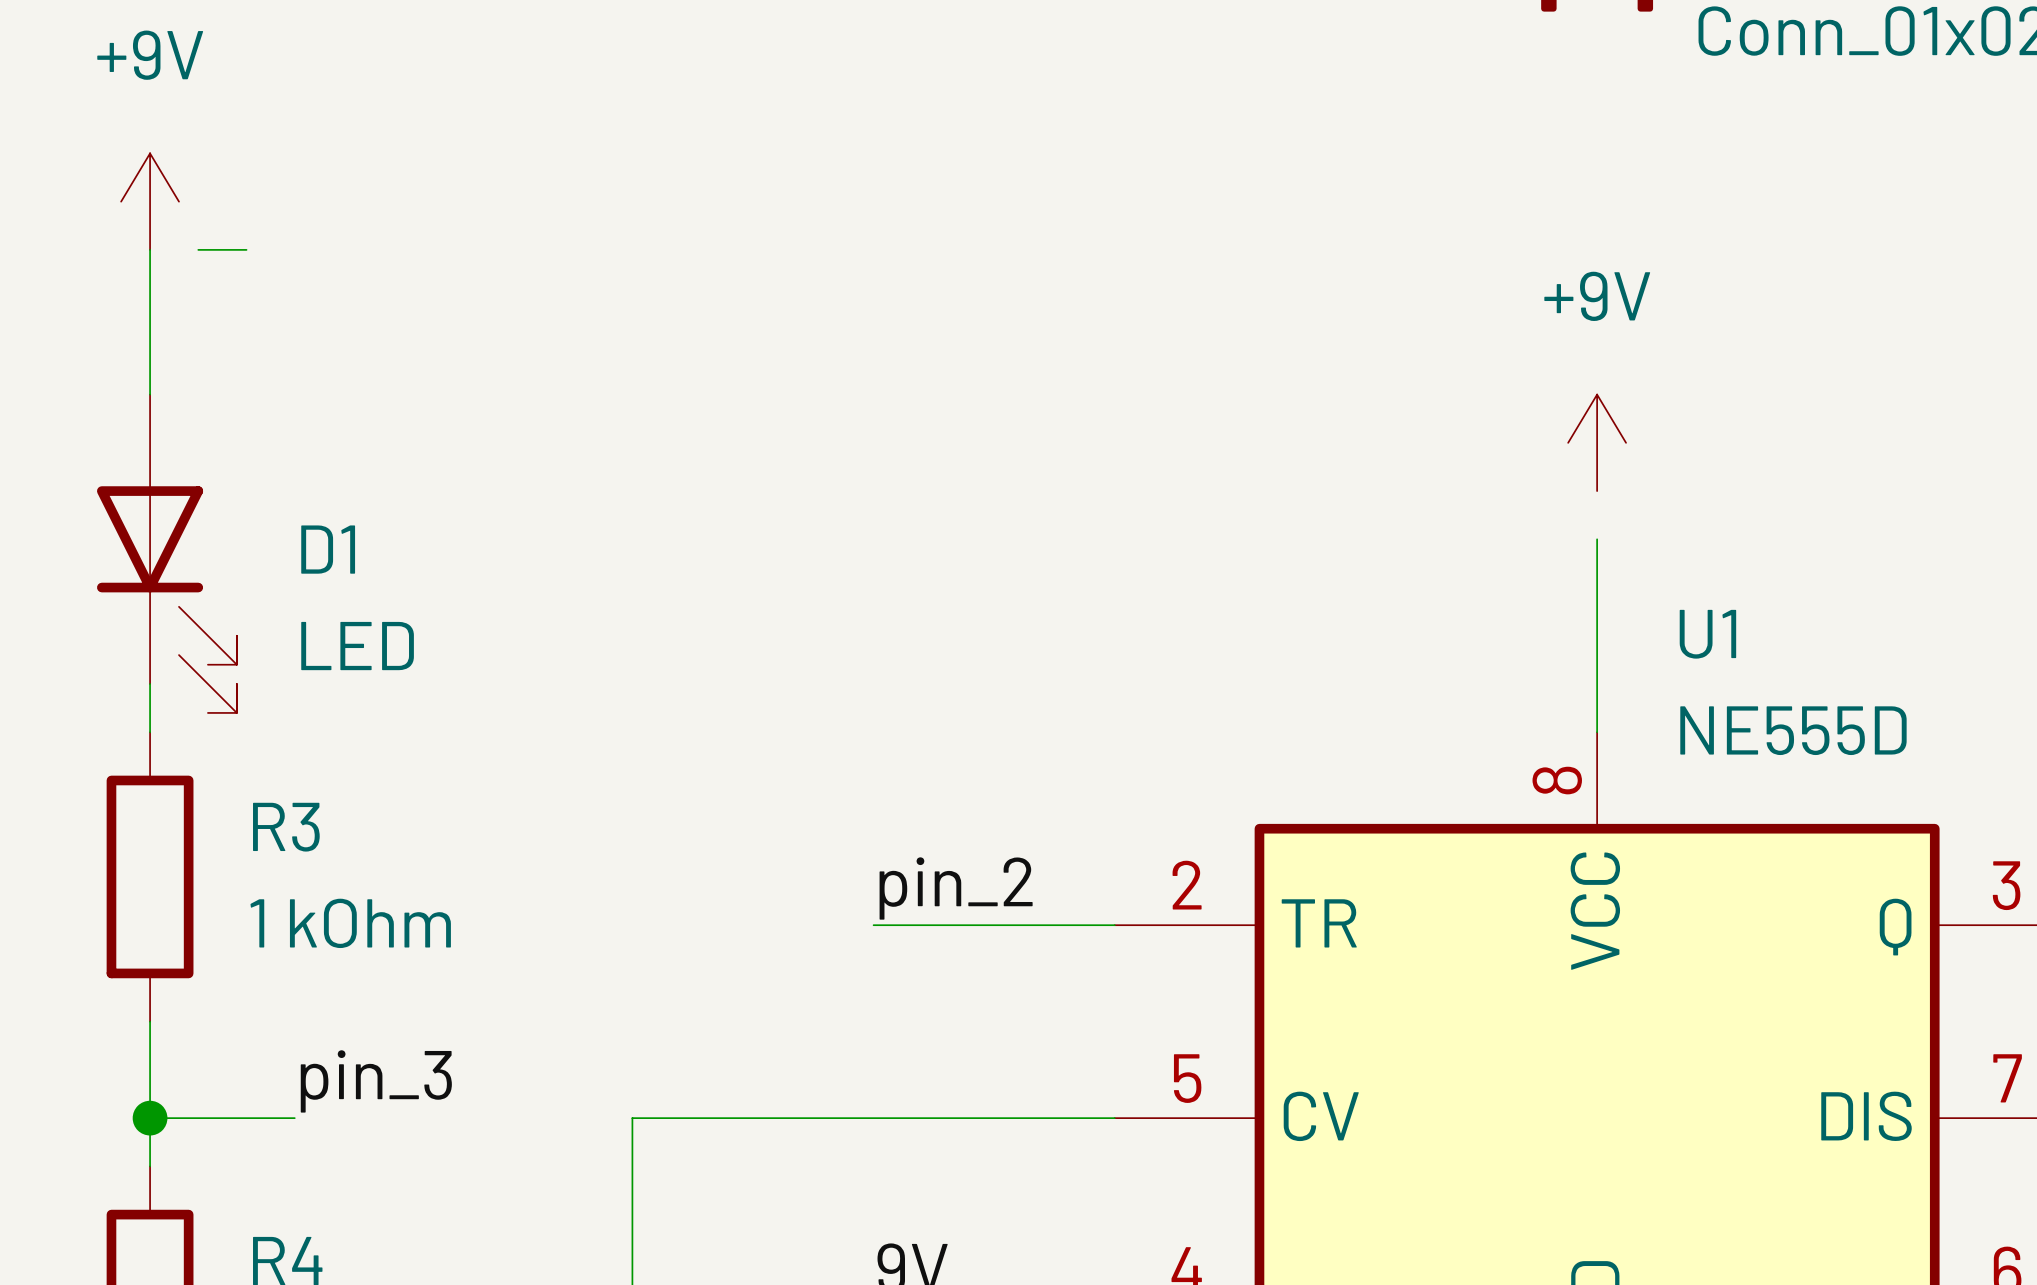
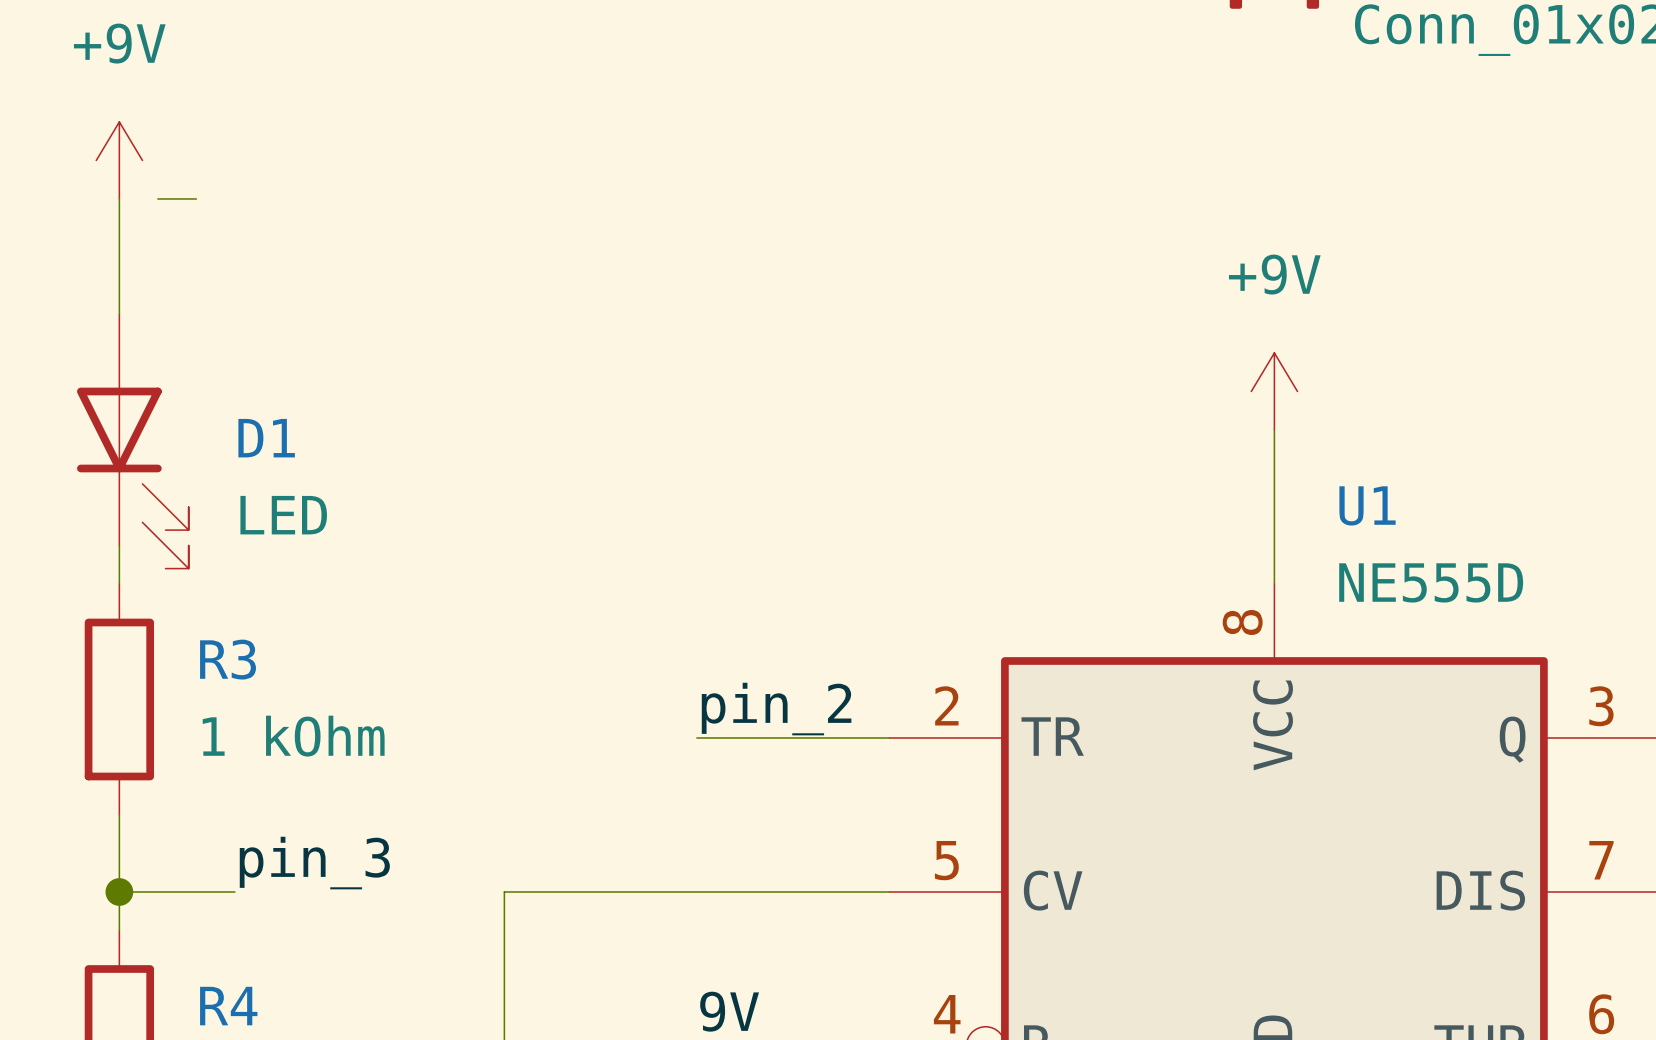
power symbol position: +9V (1597, 442) -> +9V (1274, 391)

